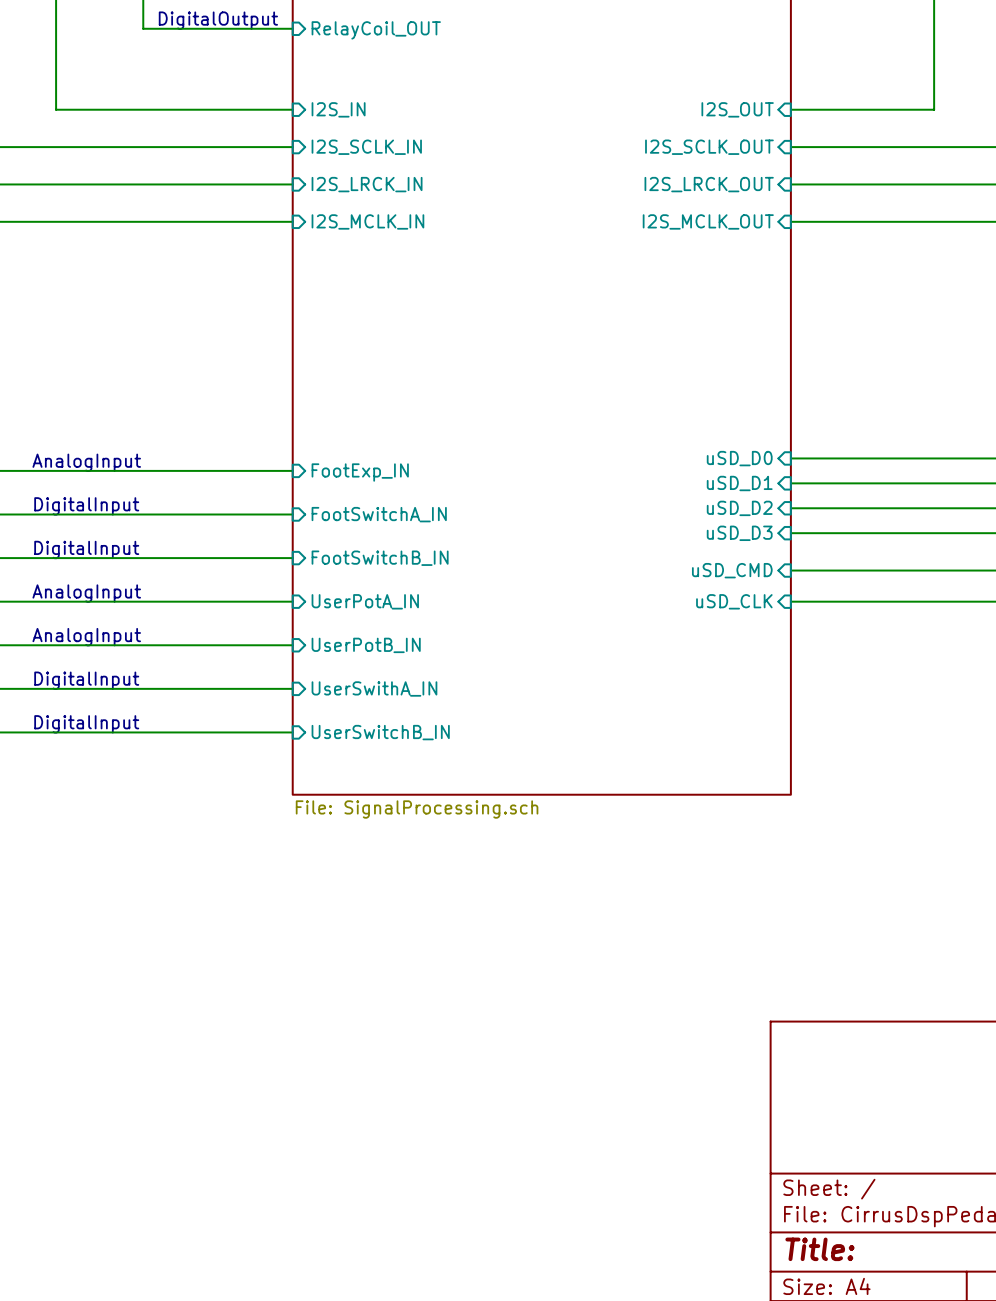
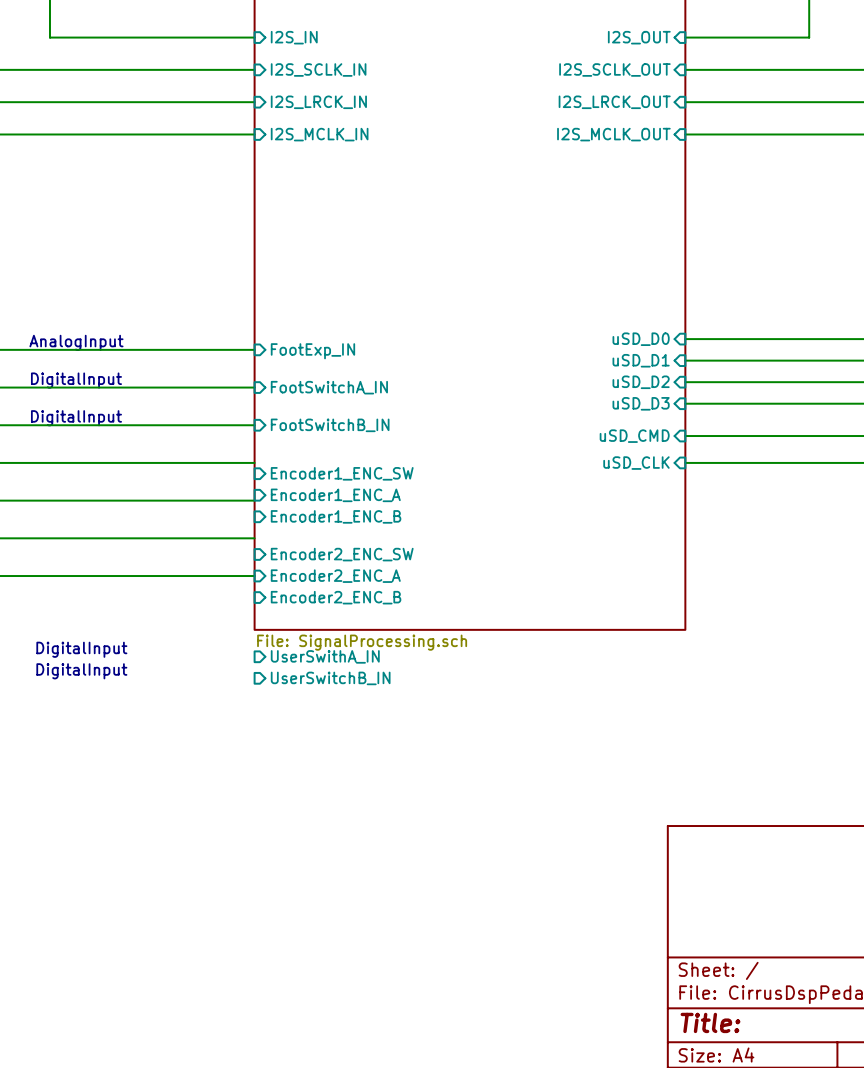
text: AnalogInput (86, 593) -> none
sheet pin: UserPotA_IN (365, 601) -> none
sheet pin: none -> Encoder1_ENC_SW (342, 473)
text: AnalogInput (86, 637) -> none
sheet pin: UserPotB_IN (366, 645) -> Encoder1_ENC_A (335, 495)
sheet pin: none -> Encoder1_ENC_B (336, 516)
text: DigitalInput (86, 680) -> none
sheet pin position: UserSwithA_IN (374, 688) -> UserSwithA_IN (325, 656)
sheet pin: none -> Encoder2_ENC_SW (342, 554)
text: DigitalInput (86, 724) -> none
sheet pin: UserSwitchB_IN (380, 732) -> Encoder2_ENC_A (335, 576)
sheet pin: none -> Encoder2_ENC_B (336, 597)
text: none -> DigitalInput (81, 649)
text: none -> DigitalInput (81, 671)
sheet pin: none -> UserSwitchB_IN (330, 678)

